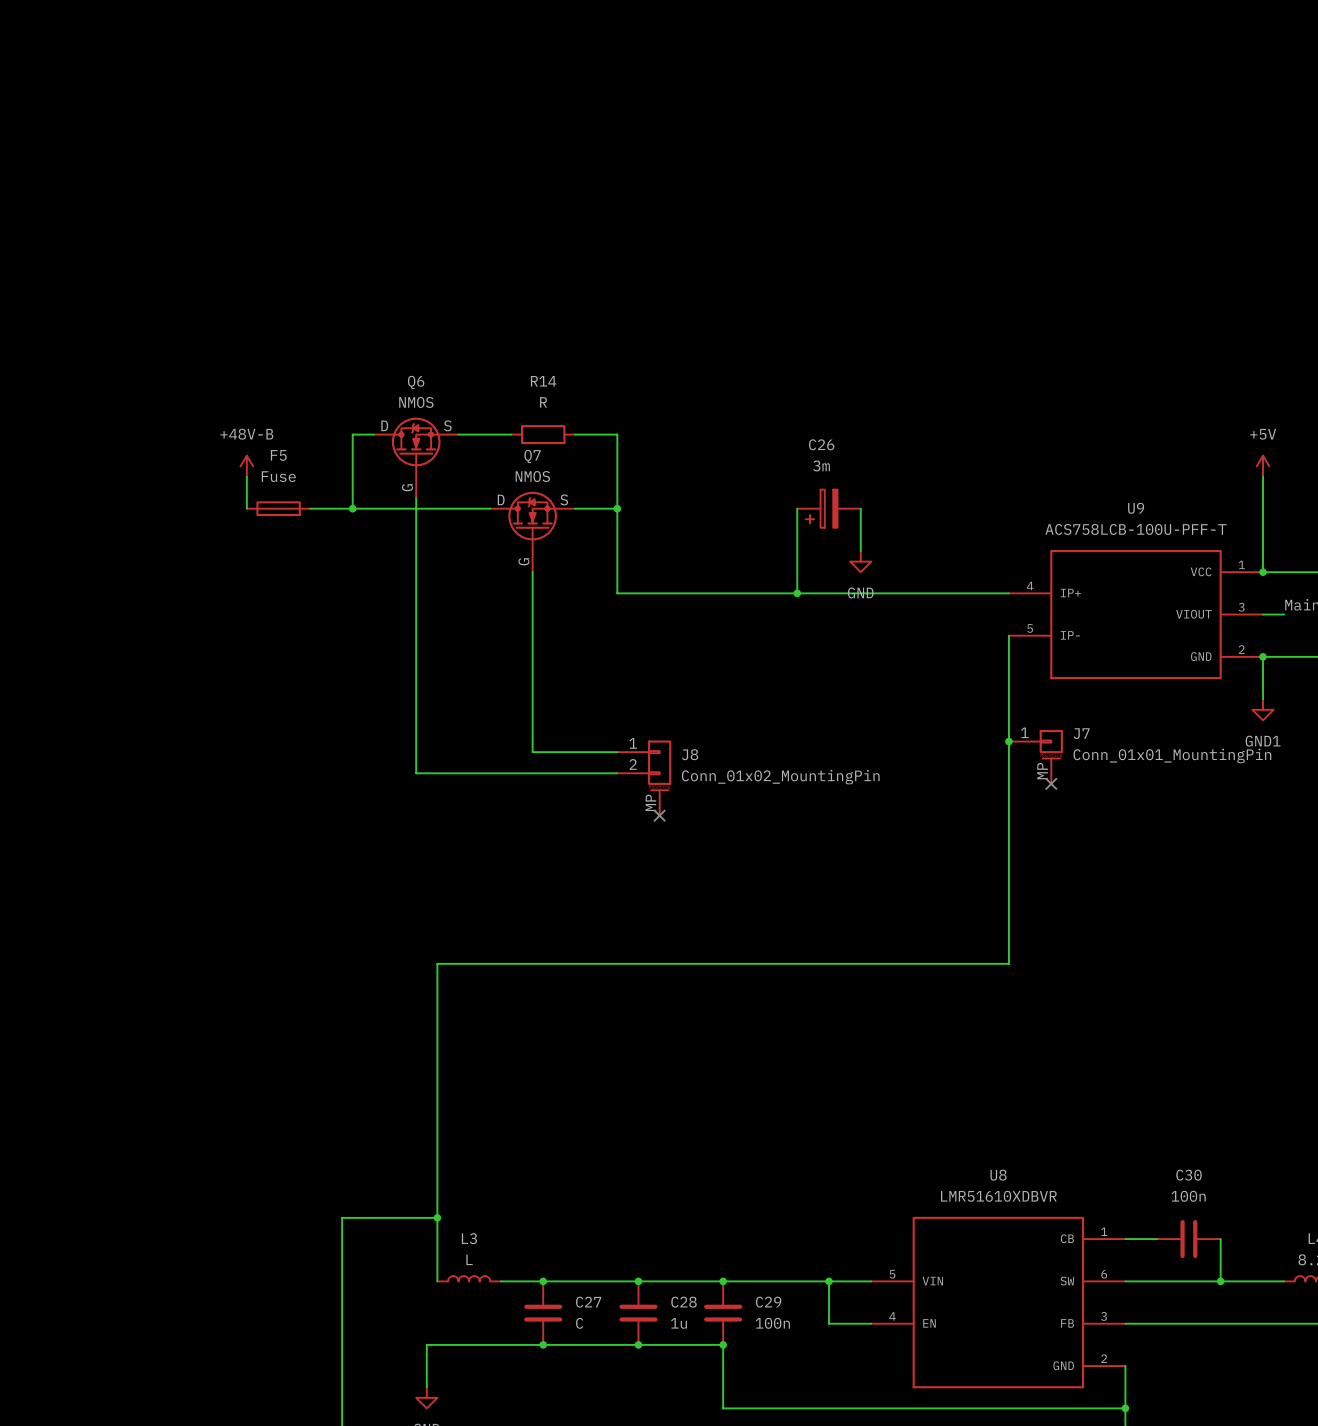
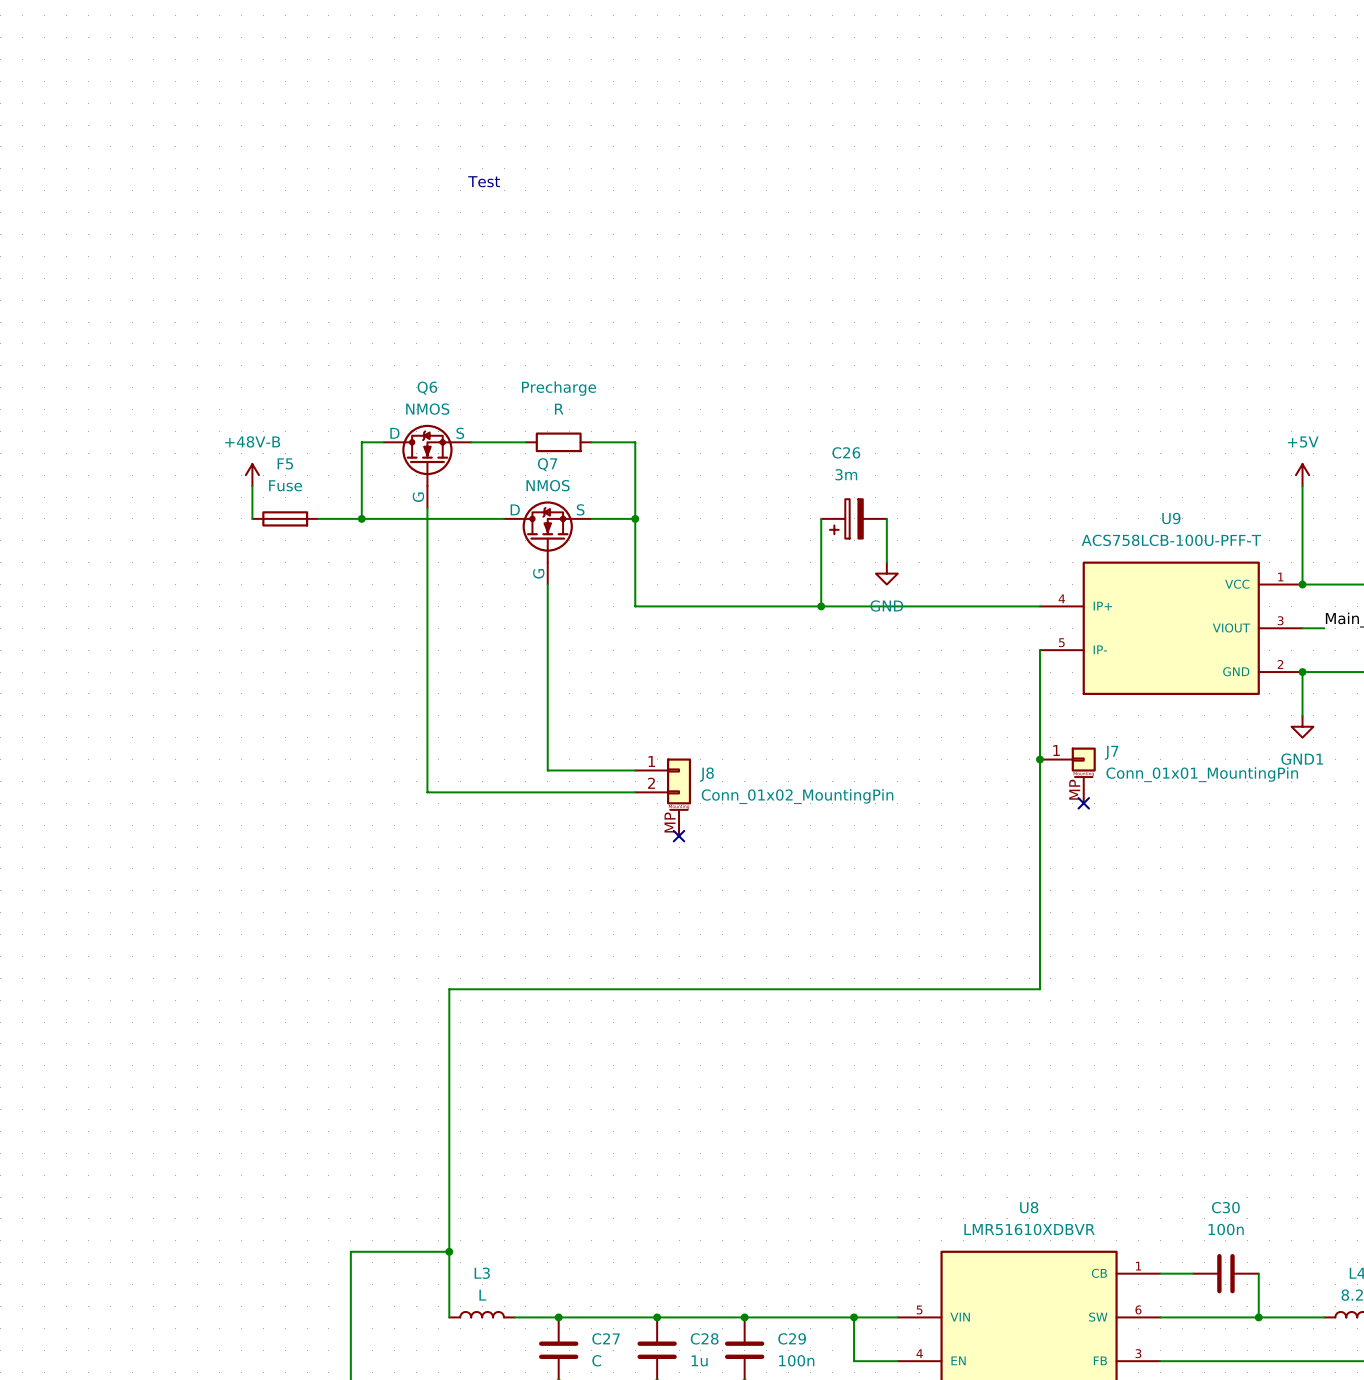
text: none -> Test (484, 181)
R14 name: R14 (543, 381) -> Precharge (559, 388)

